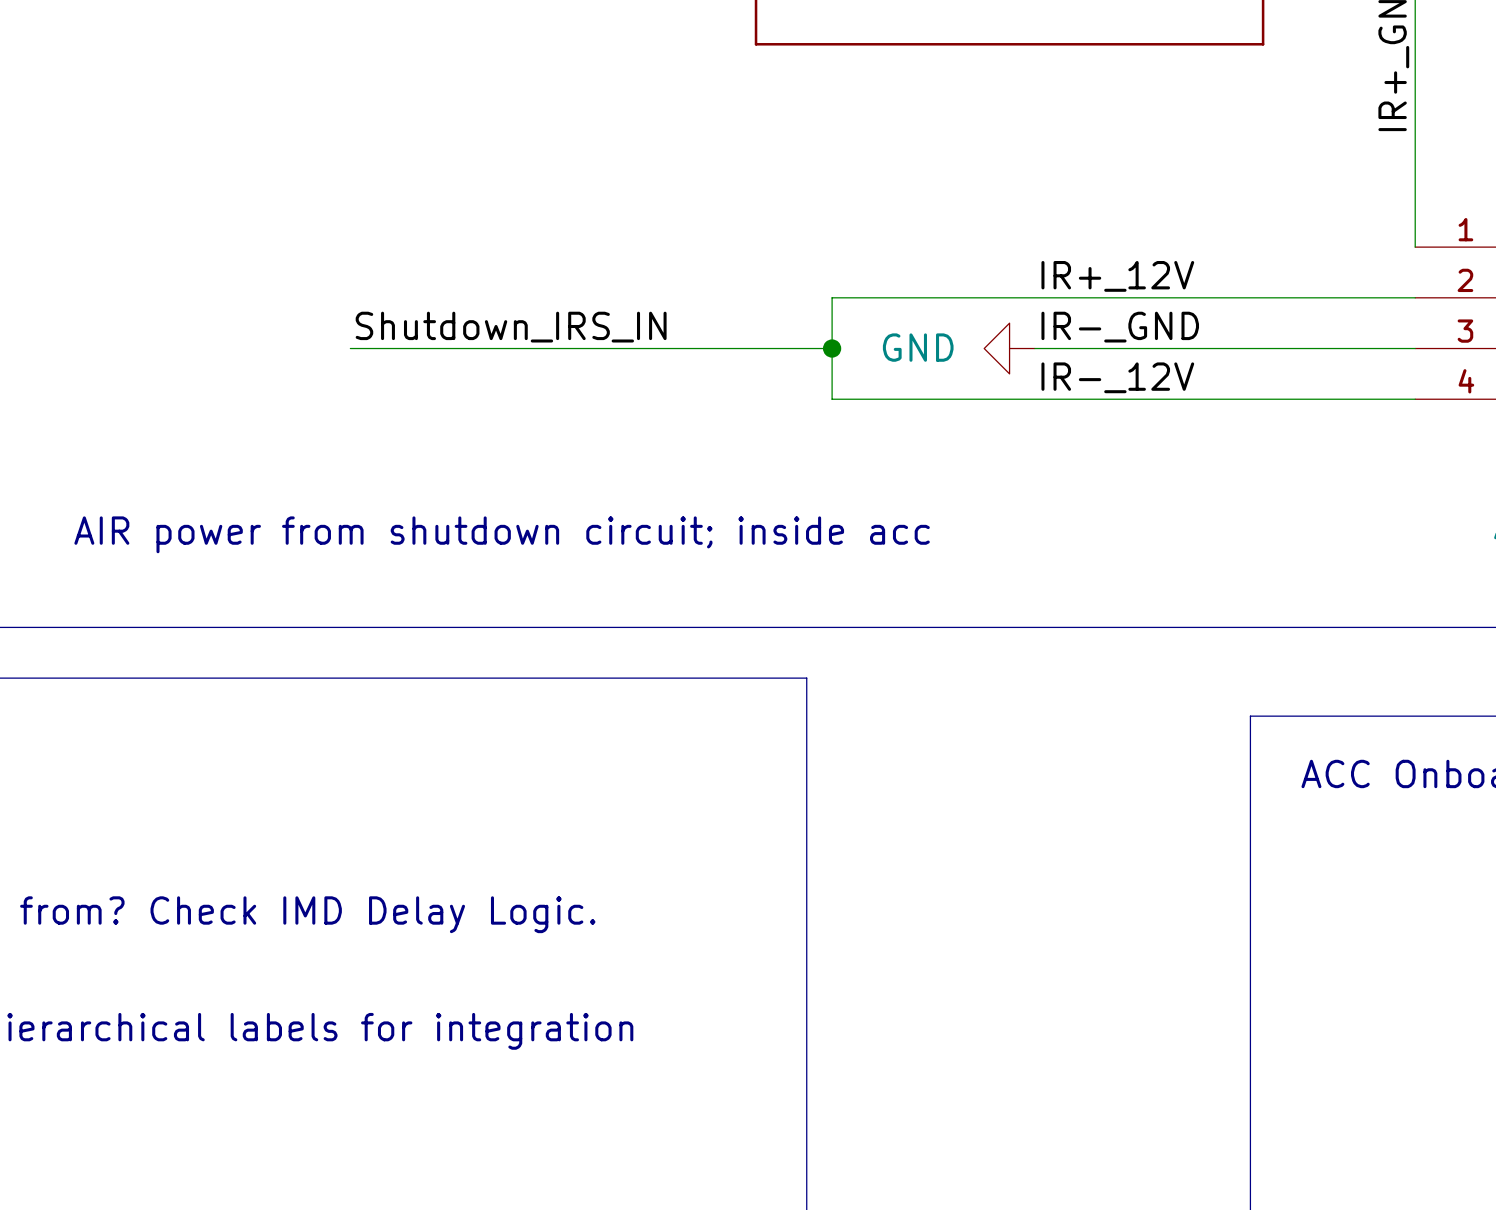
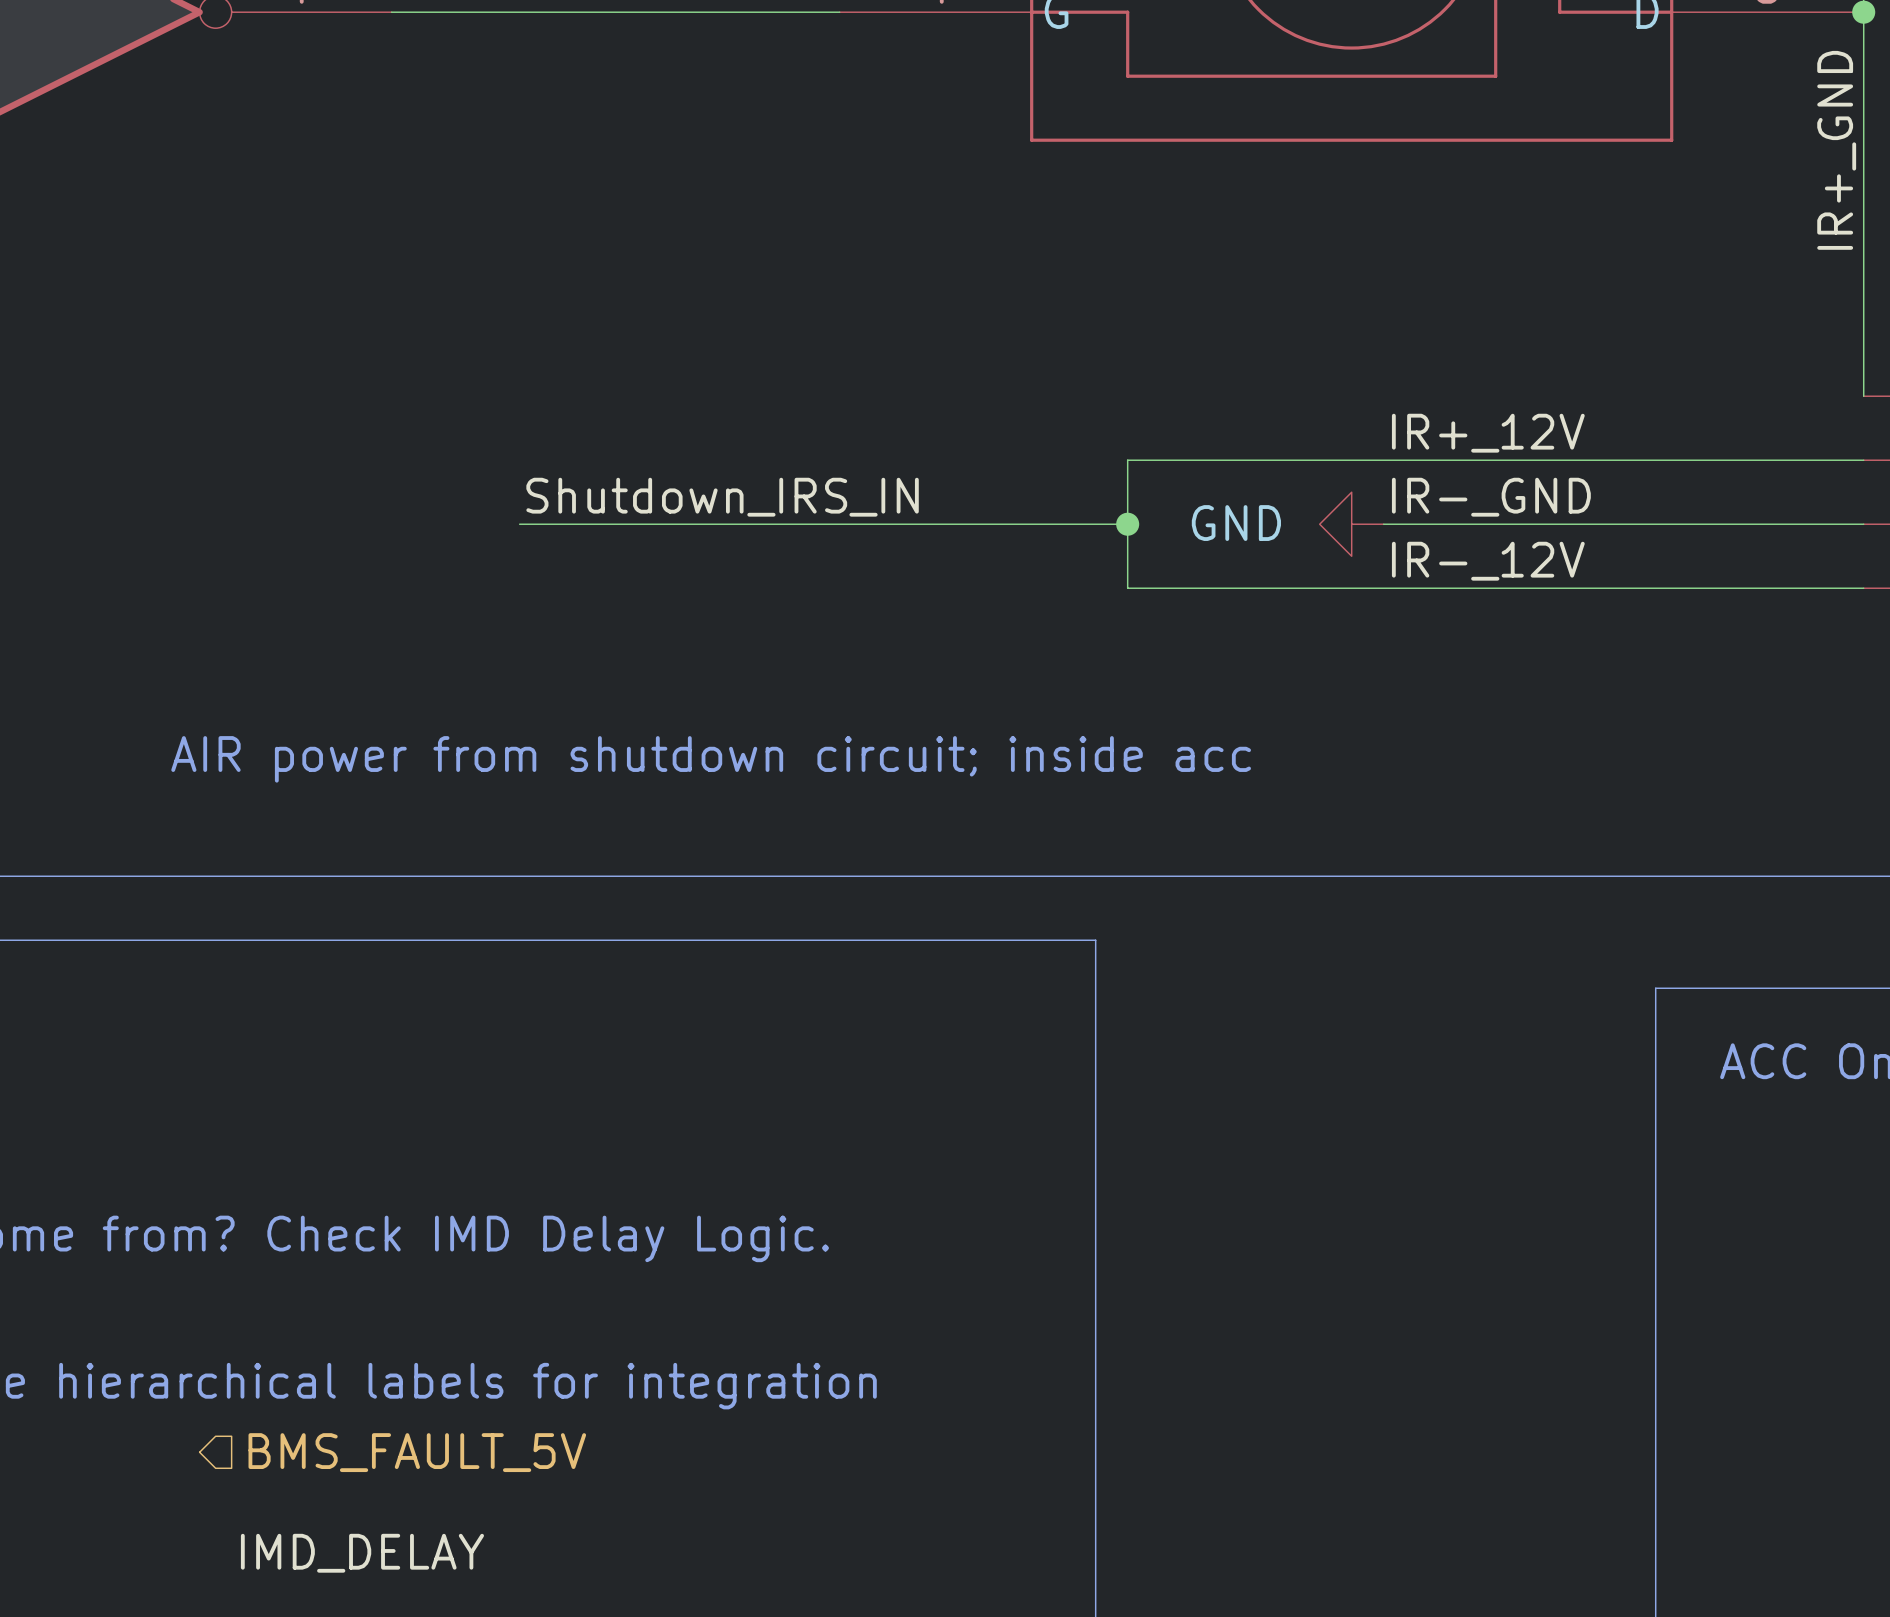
hierarchical label: none -> BMS_FAULT_5V (417, 1452)
label: none -> IMD_DELAY (362, 1553)

